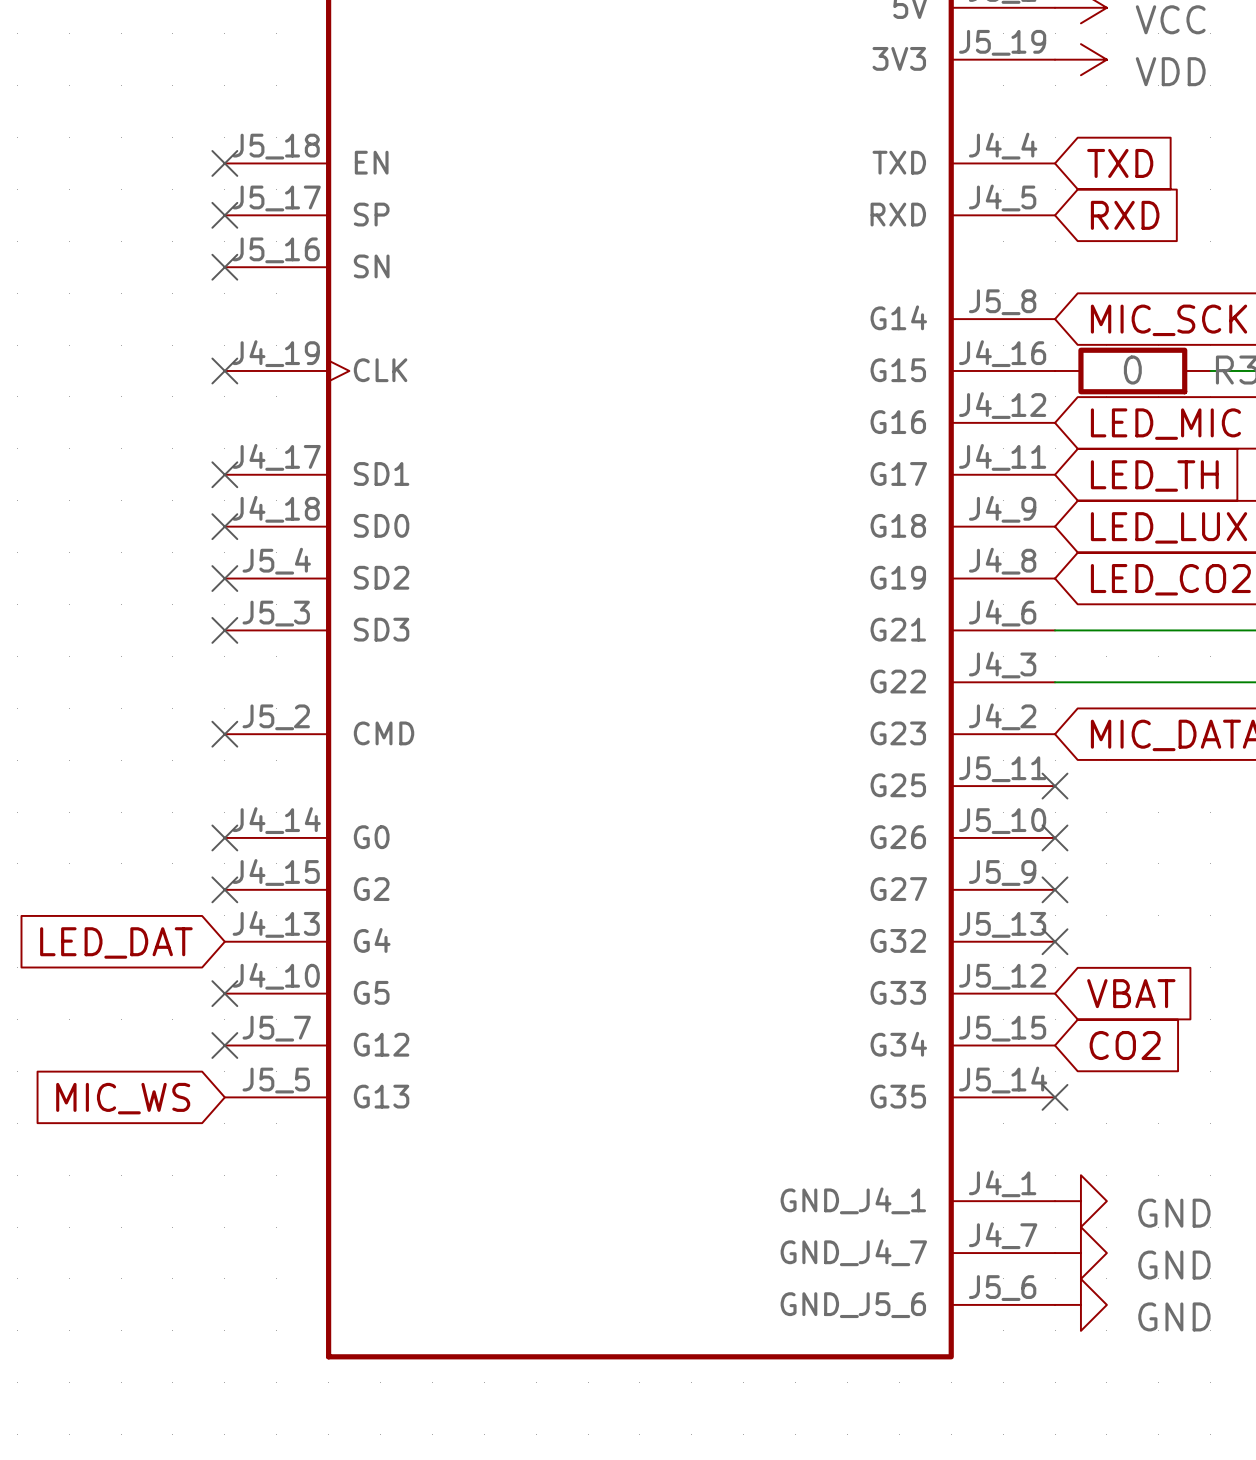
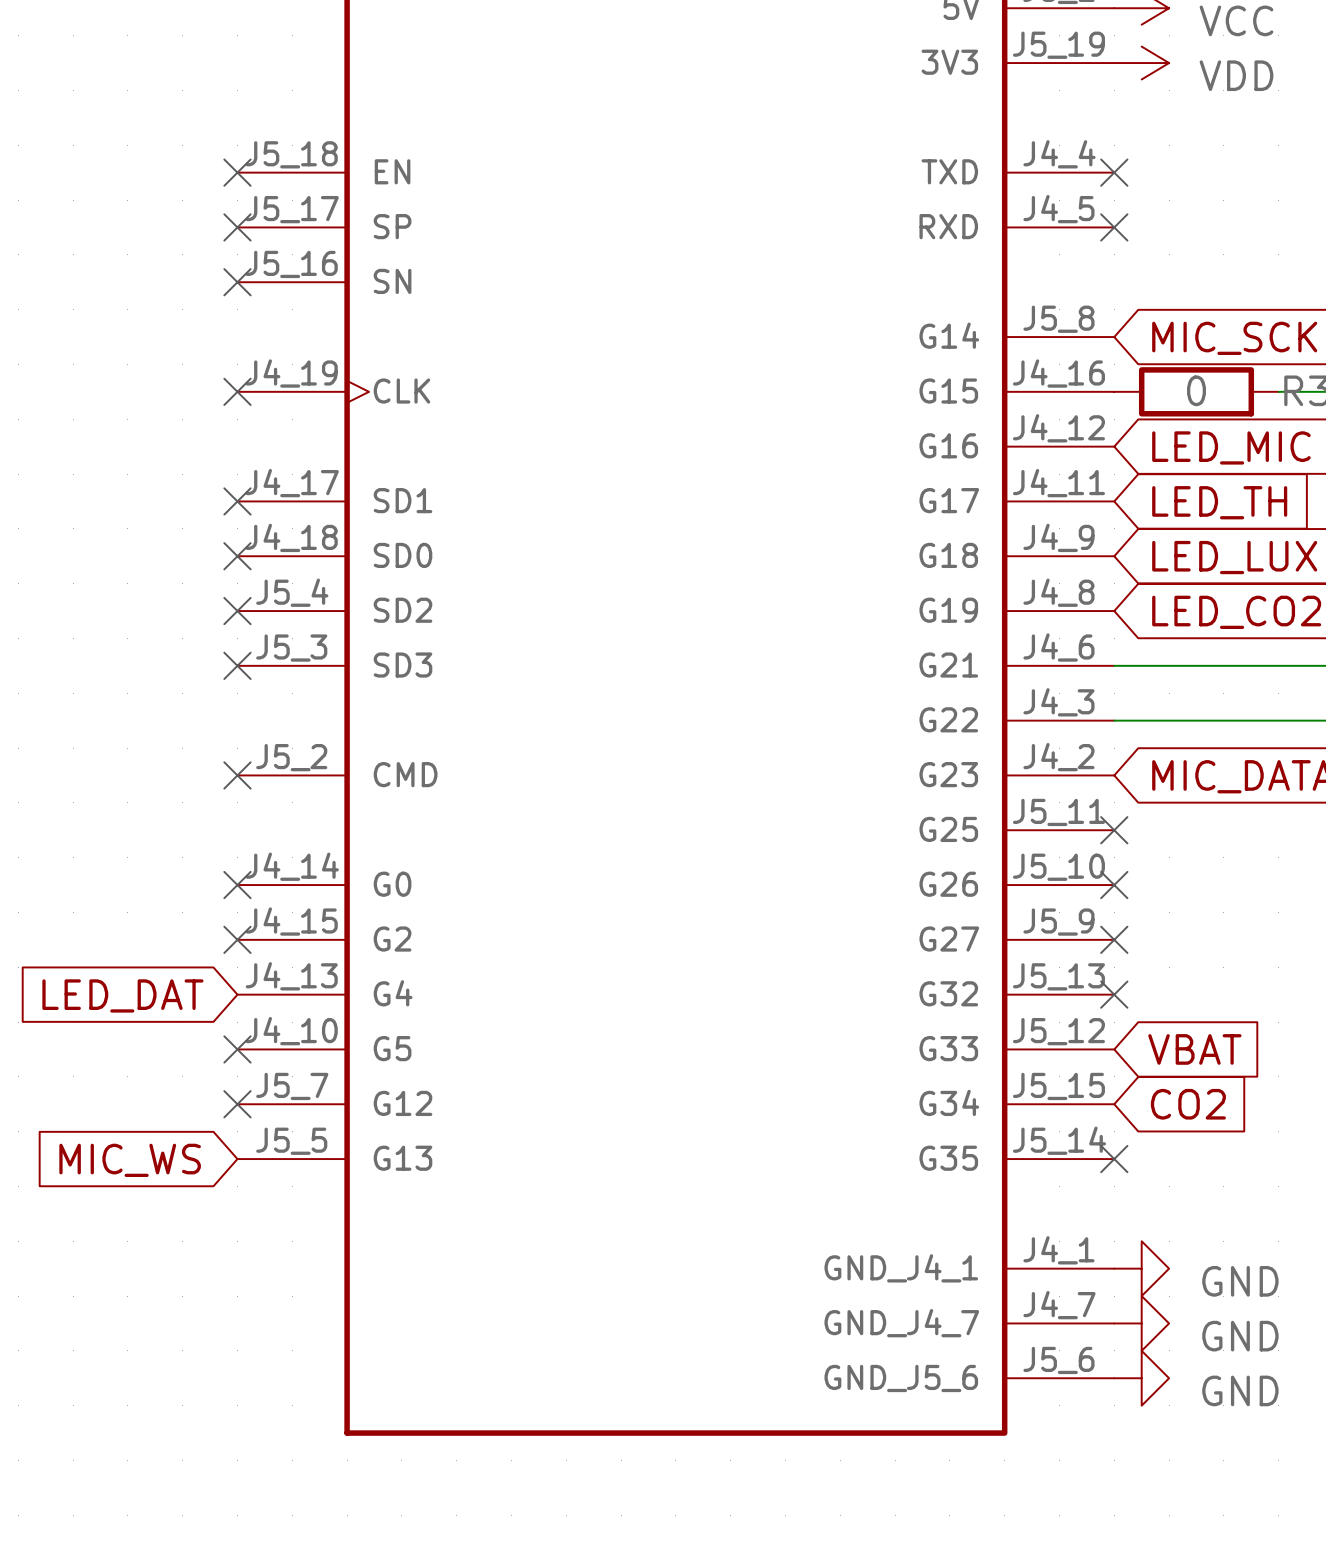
no-connect mark: none -> (1114, 172)
global label: TXD (1120, 163) -> none
no-connect mark: none -> (1114, 227)
global label: RXD (1125, 215) -> none

